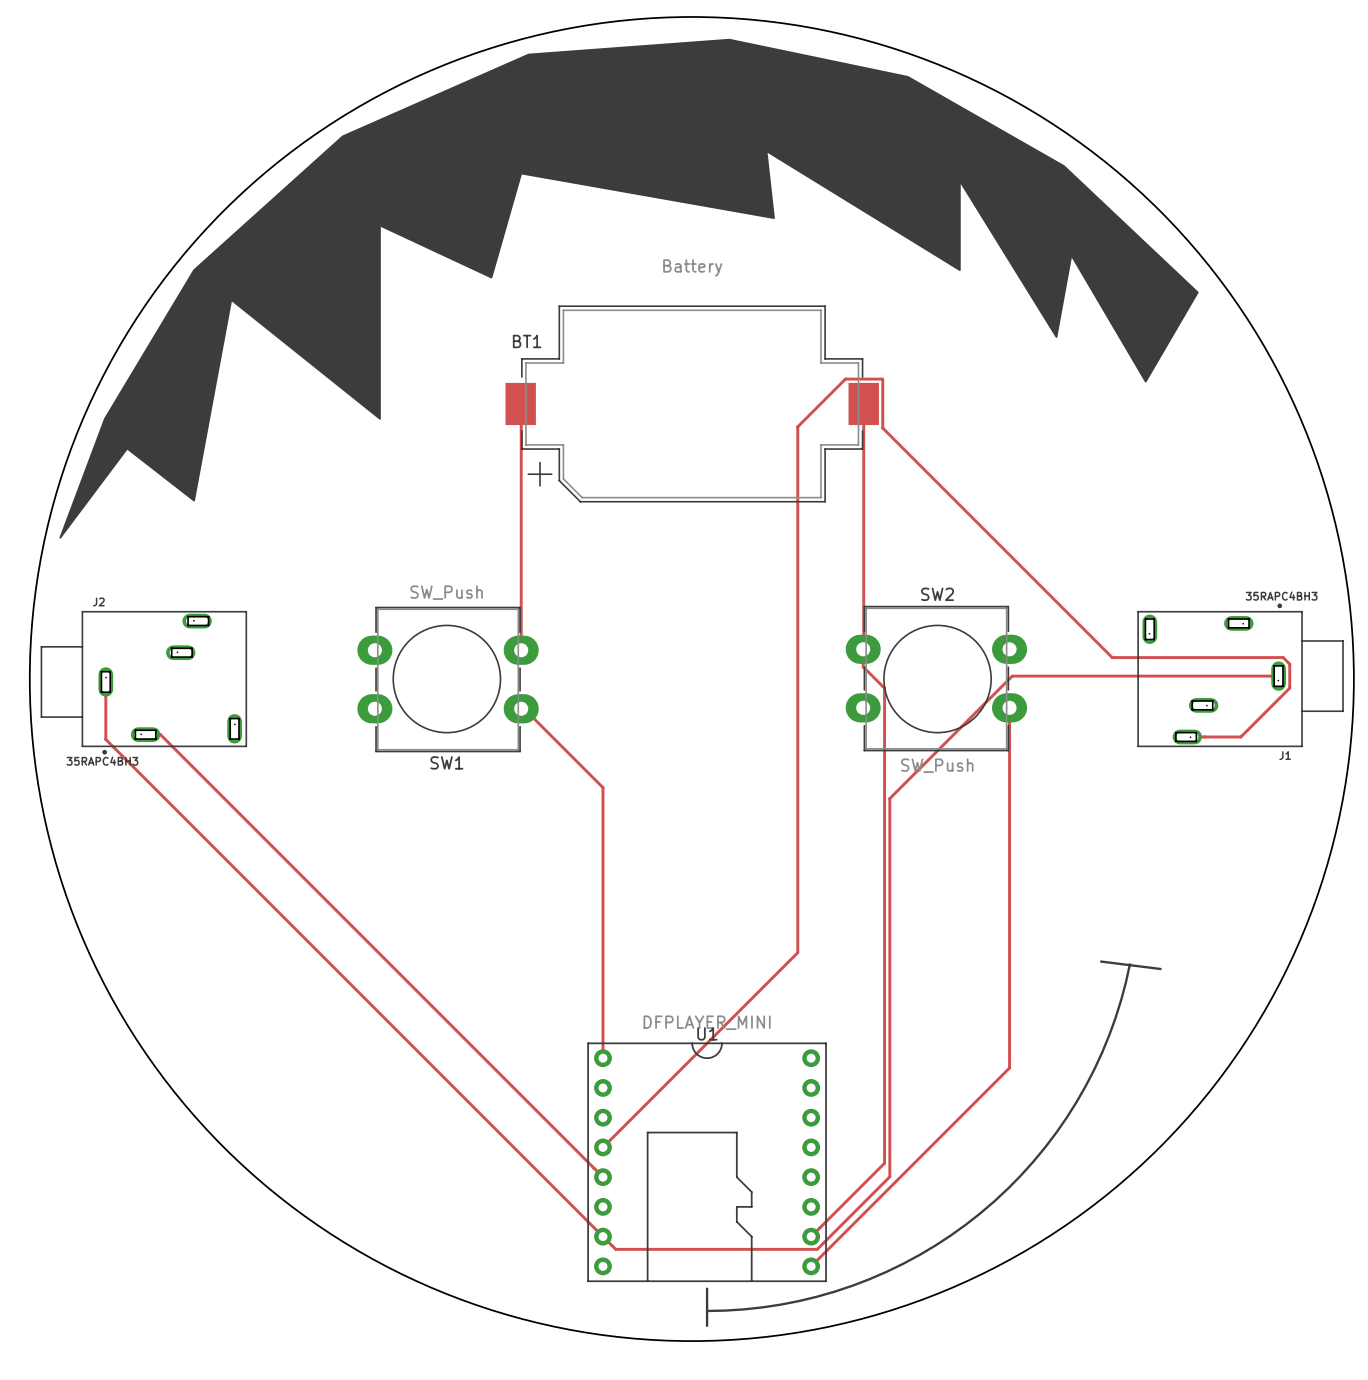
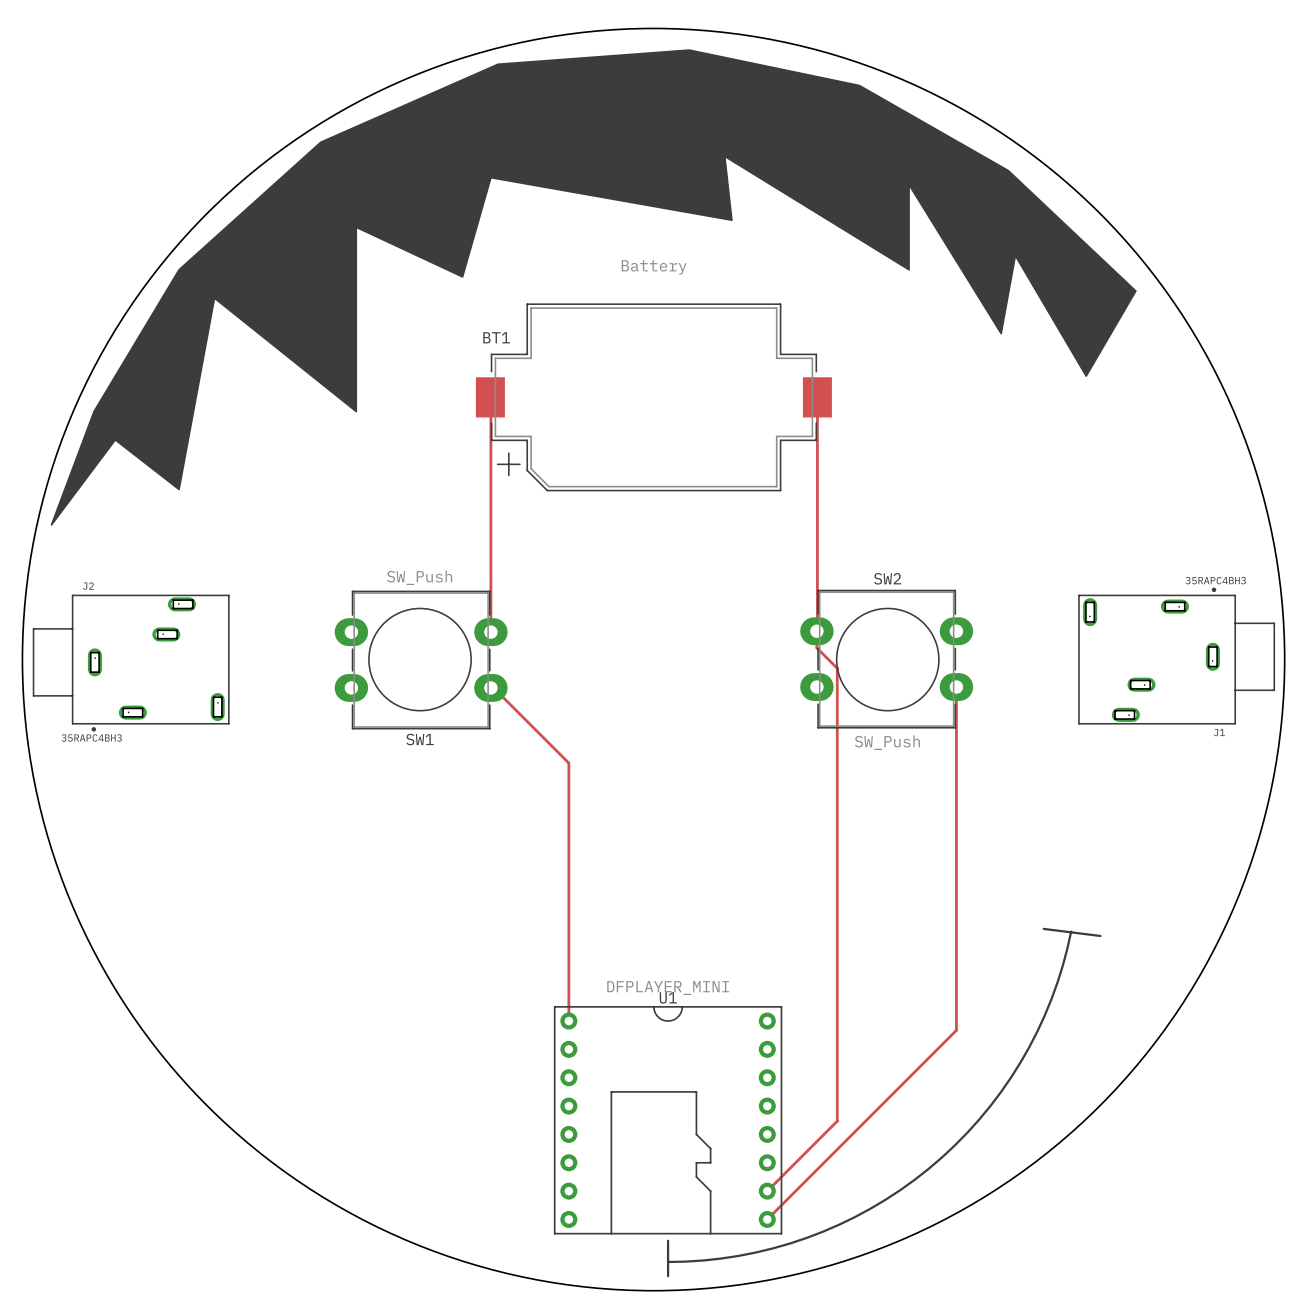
top track: (1278, 676) (1012, 676) (889, 798) (889, 1176) (817, 1249) (615, 1249) (105, 739) (105, 681) -> none
top track: (145, 734) (160, 734) (602, 1177) -> none
top track: (1187, 736) (1240, 736) (1289, 688) (1289, 664) (1283, 657) (1112, 657) (882, 428) (882, 379) (845, 379) (797, 426) (797, 952) (602, 1147) -> none

